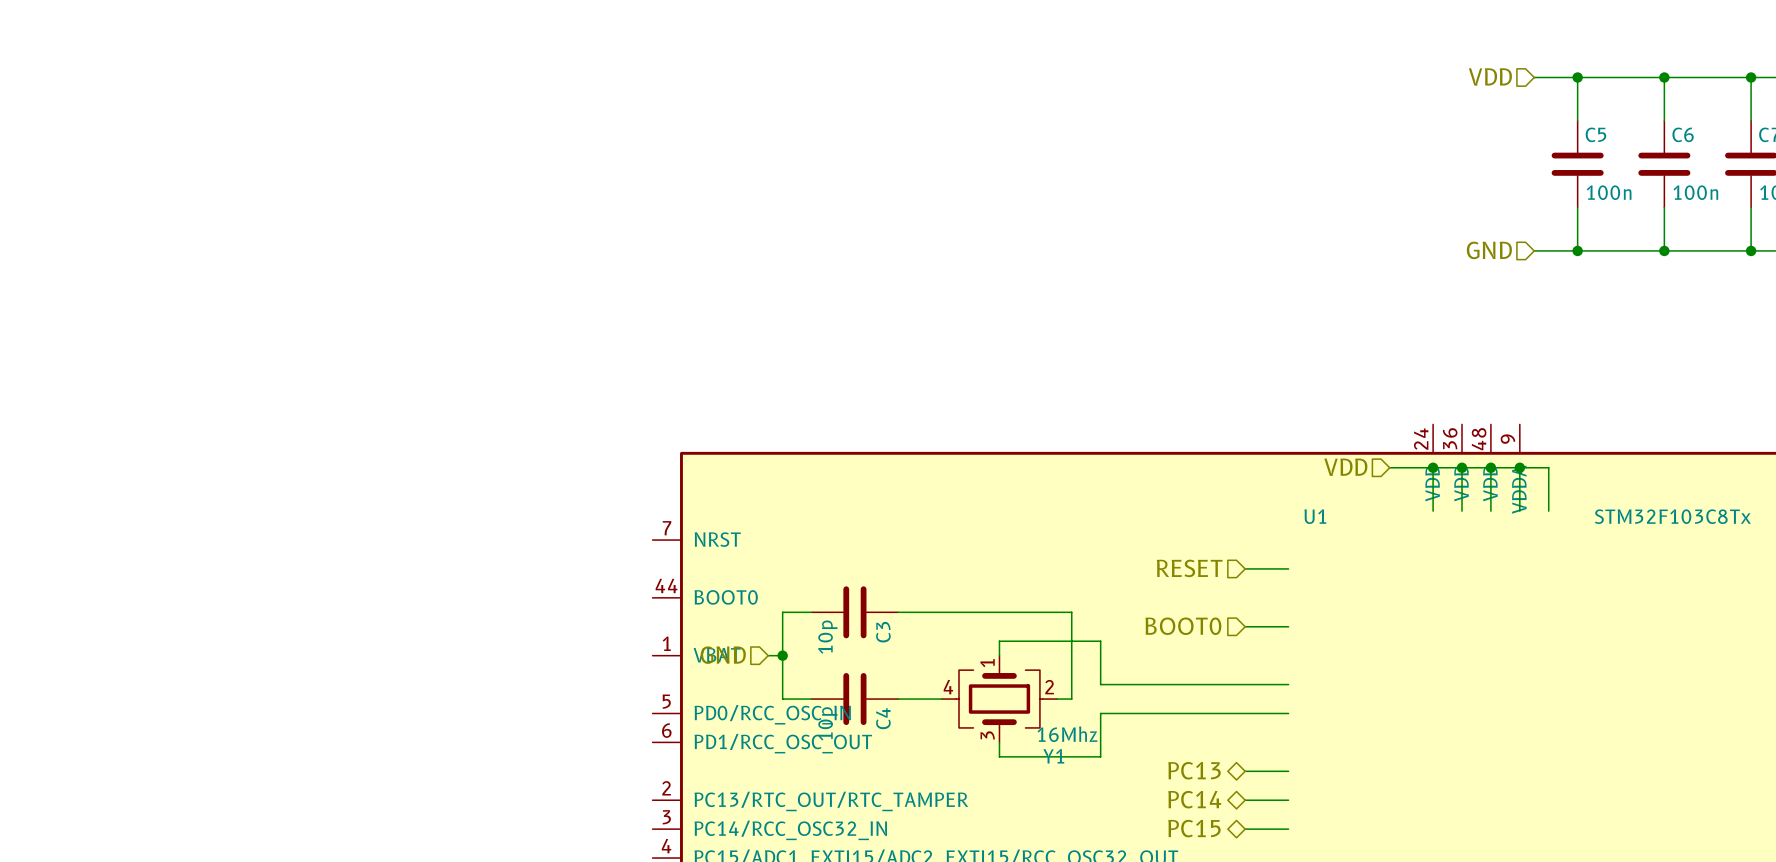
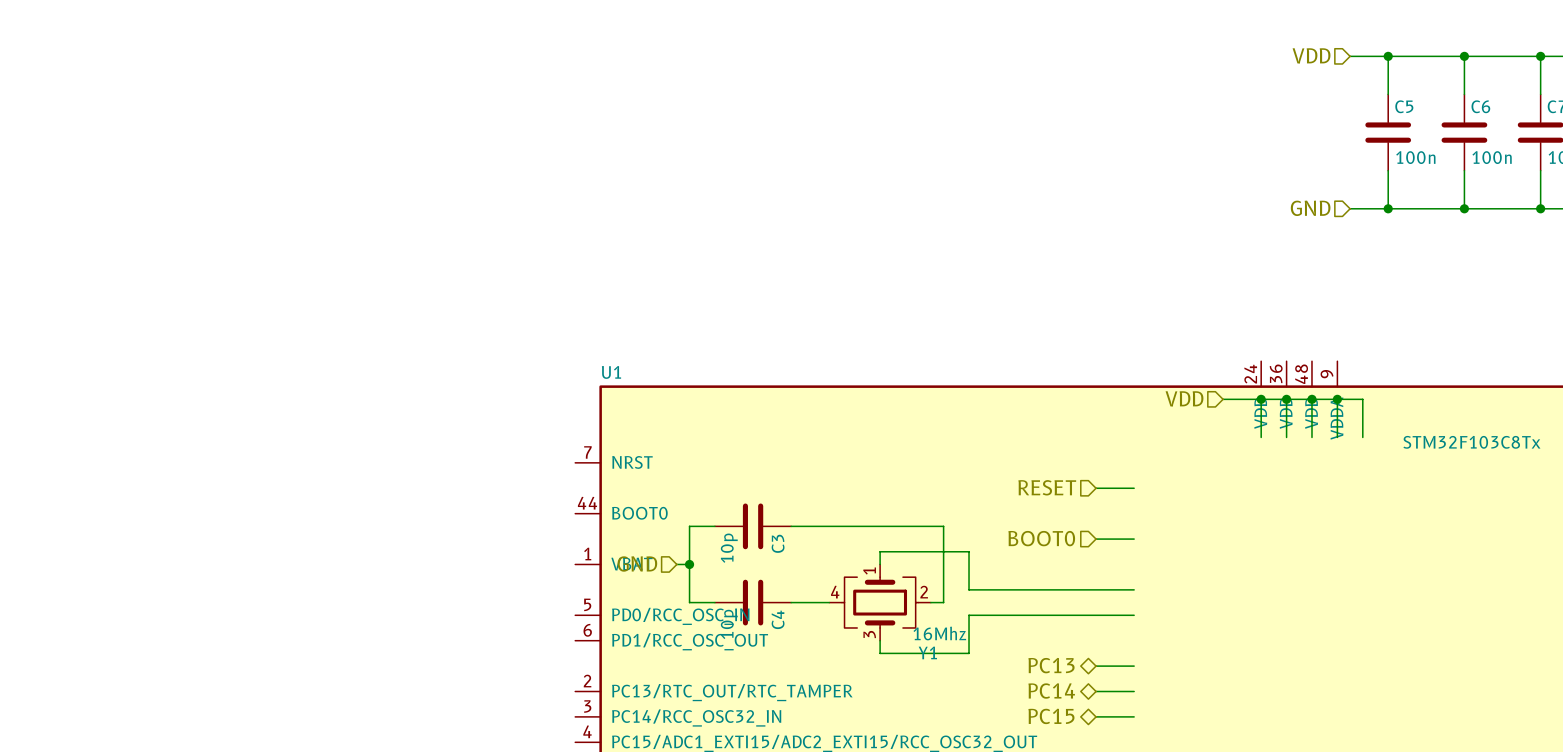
U1 name position: U1 (1315, 516) -> U1 (611, 372)

